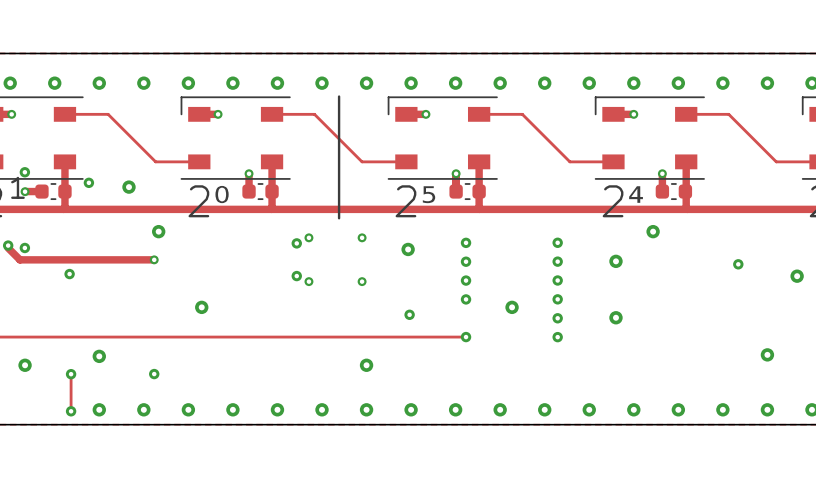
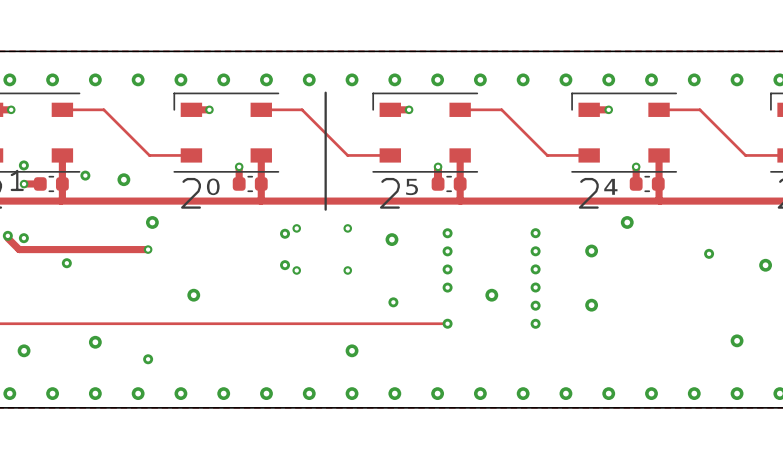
track: (71, 374) (71, 411) -> none
via: (71, 374) -> none
via: none -> (9, 393)
via: none -> (52, 393)
via: (71, 411) -> none

